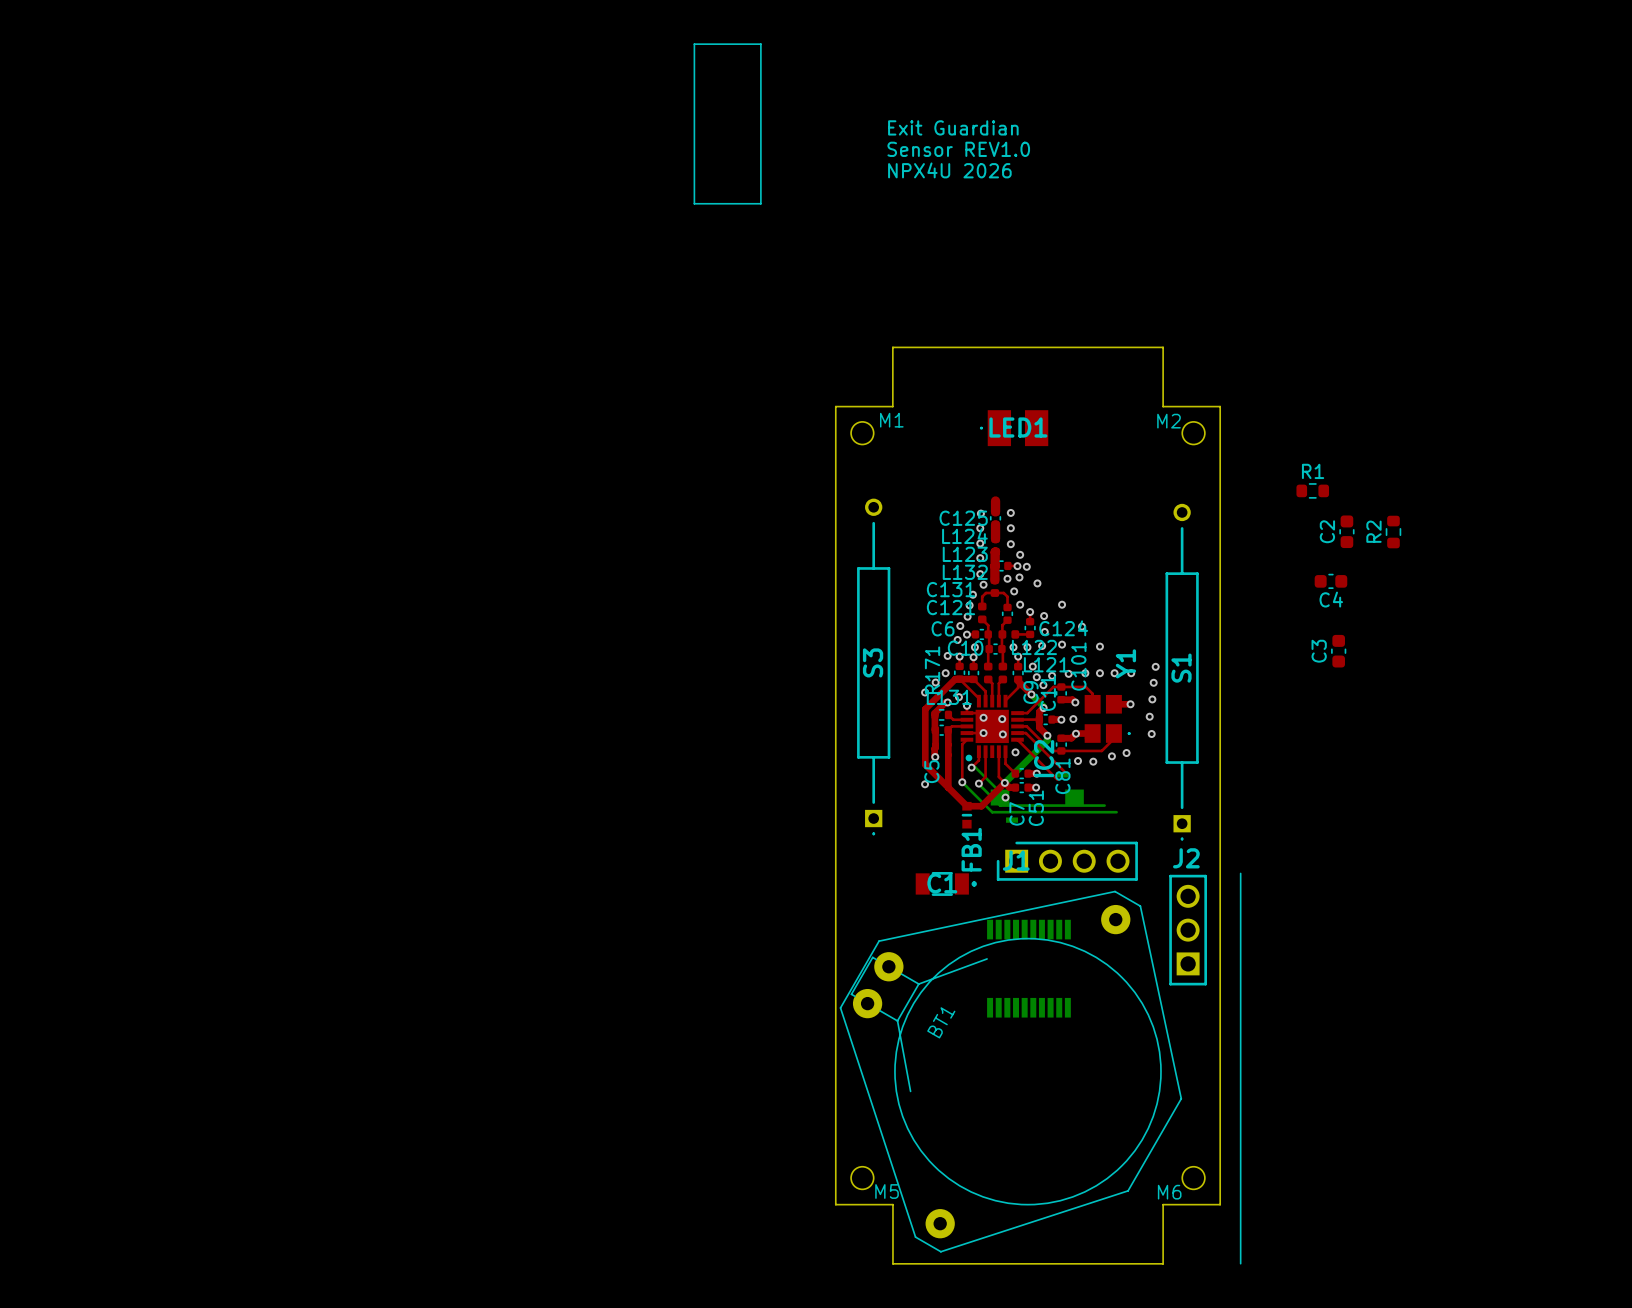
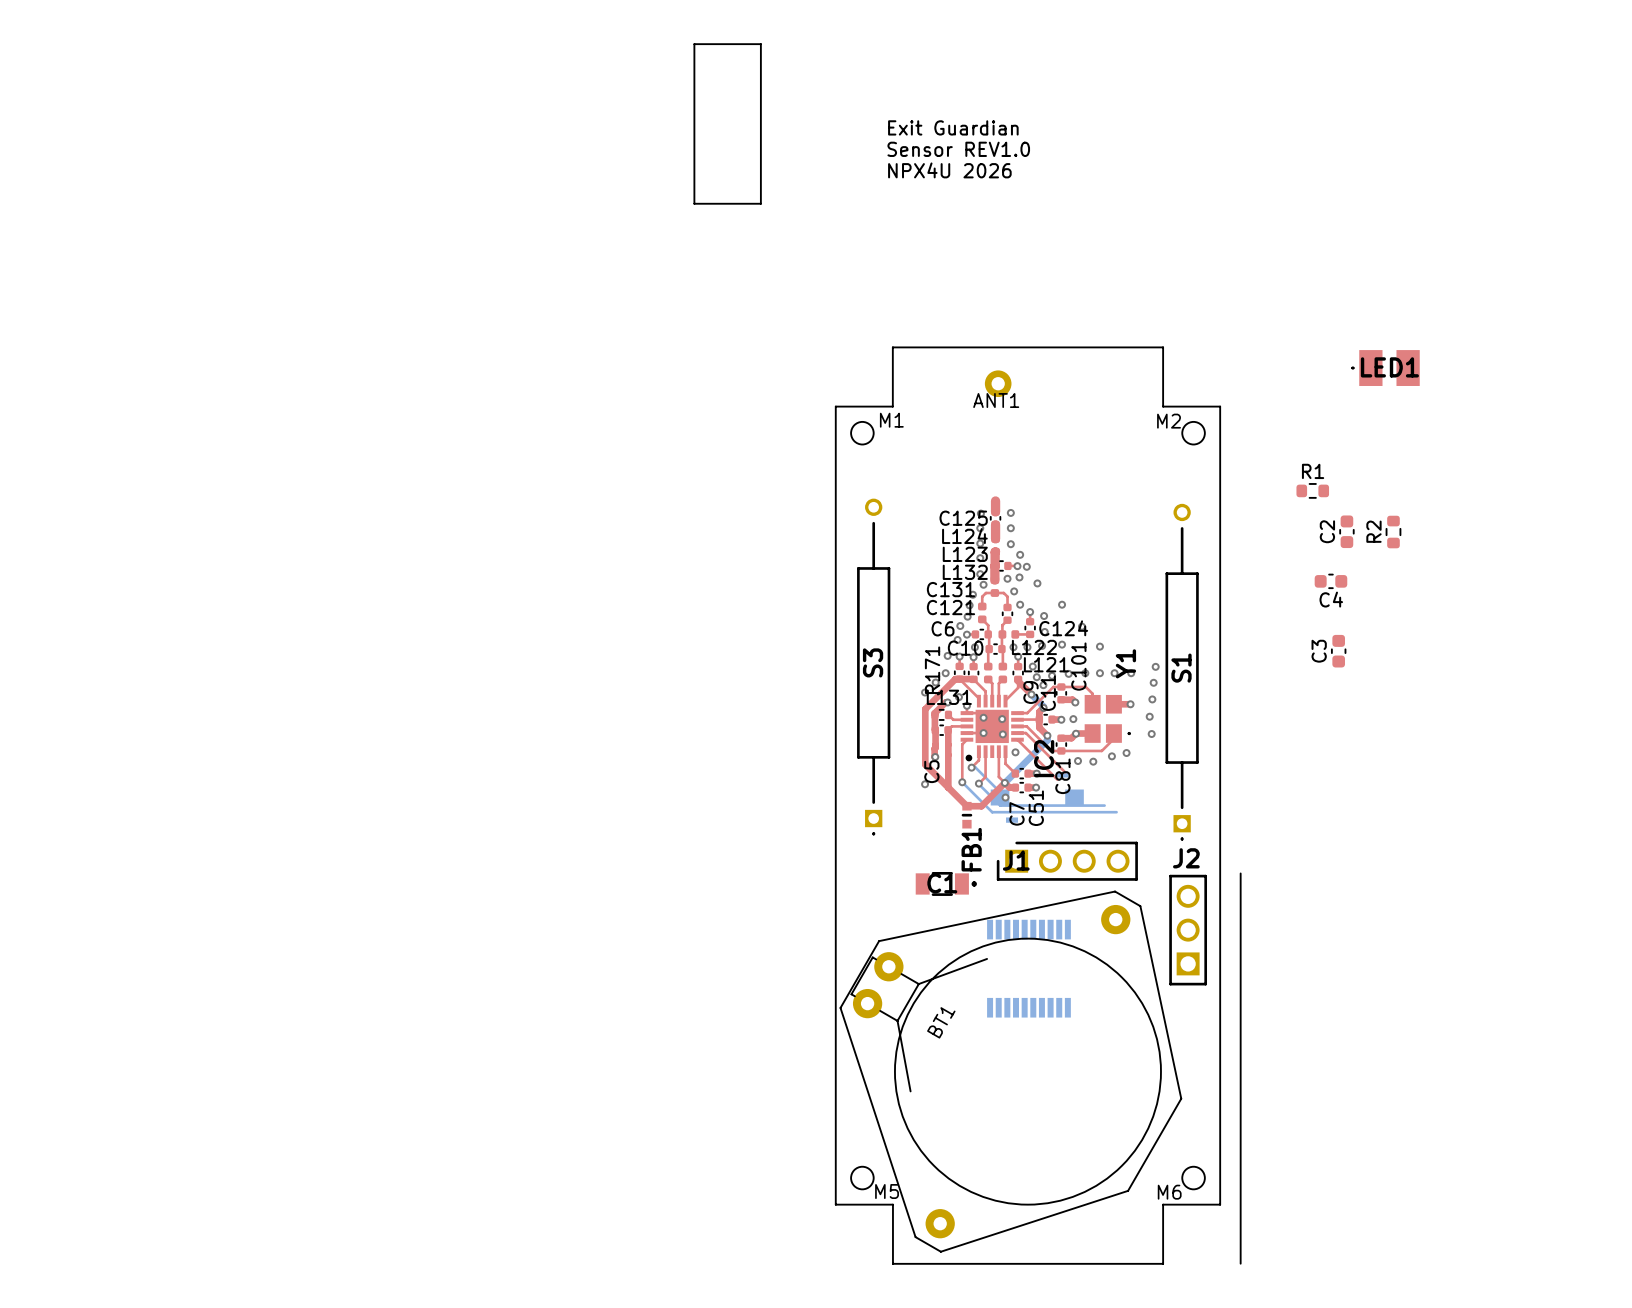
ANT1: none -> (998, 383)
LED1 position: (1014, 428) -> (1385, 368)

